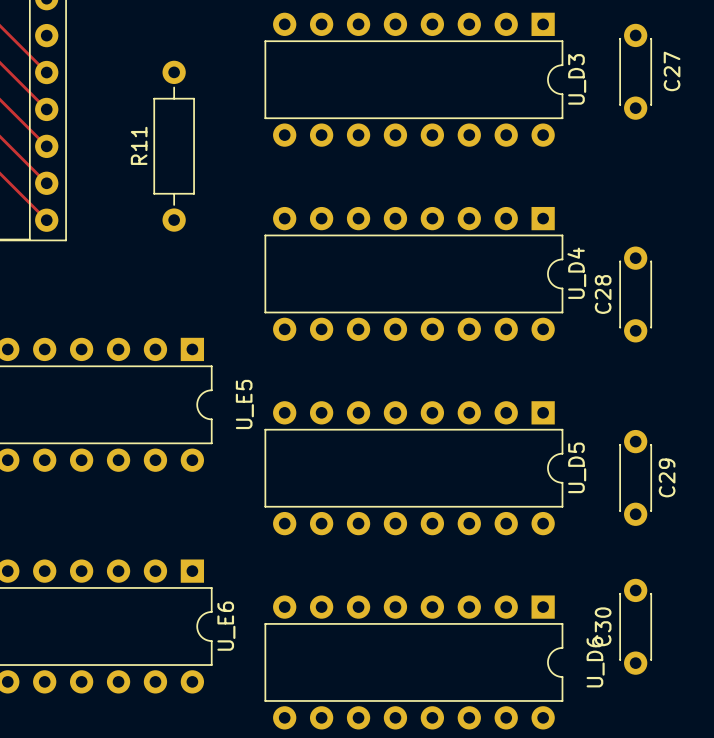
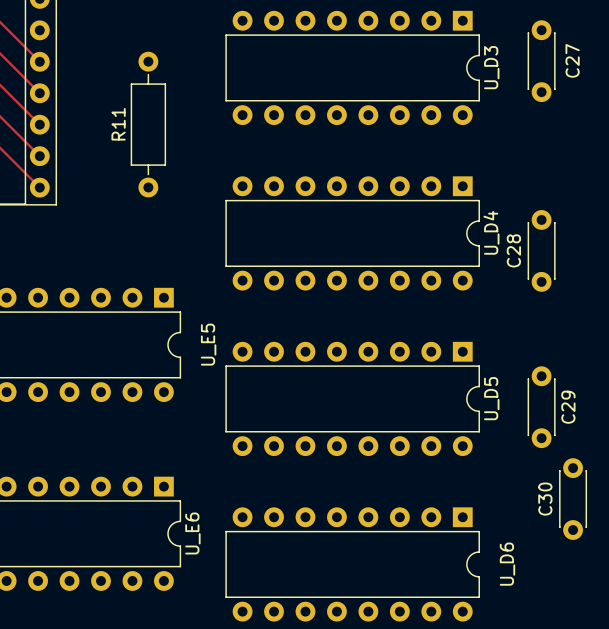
C30 position: (635, 626) -> (573, 499)

